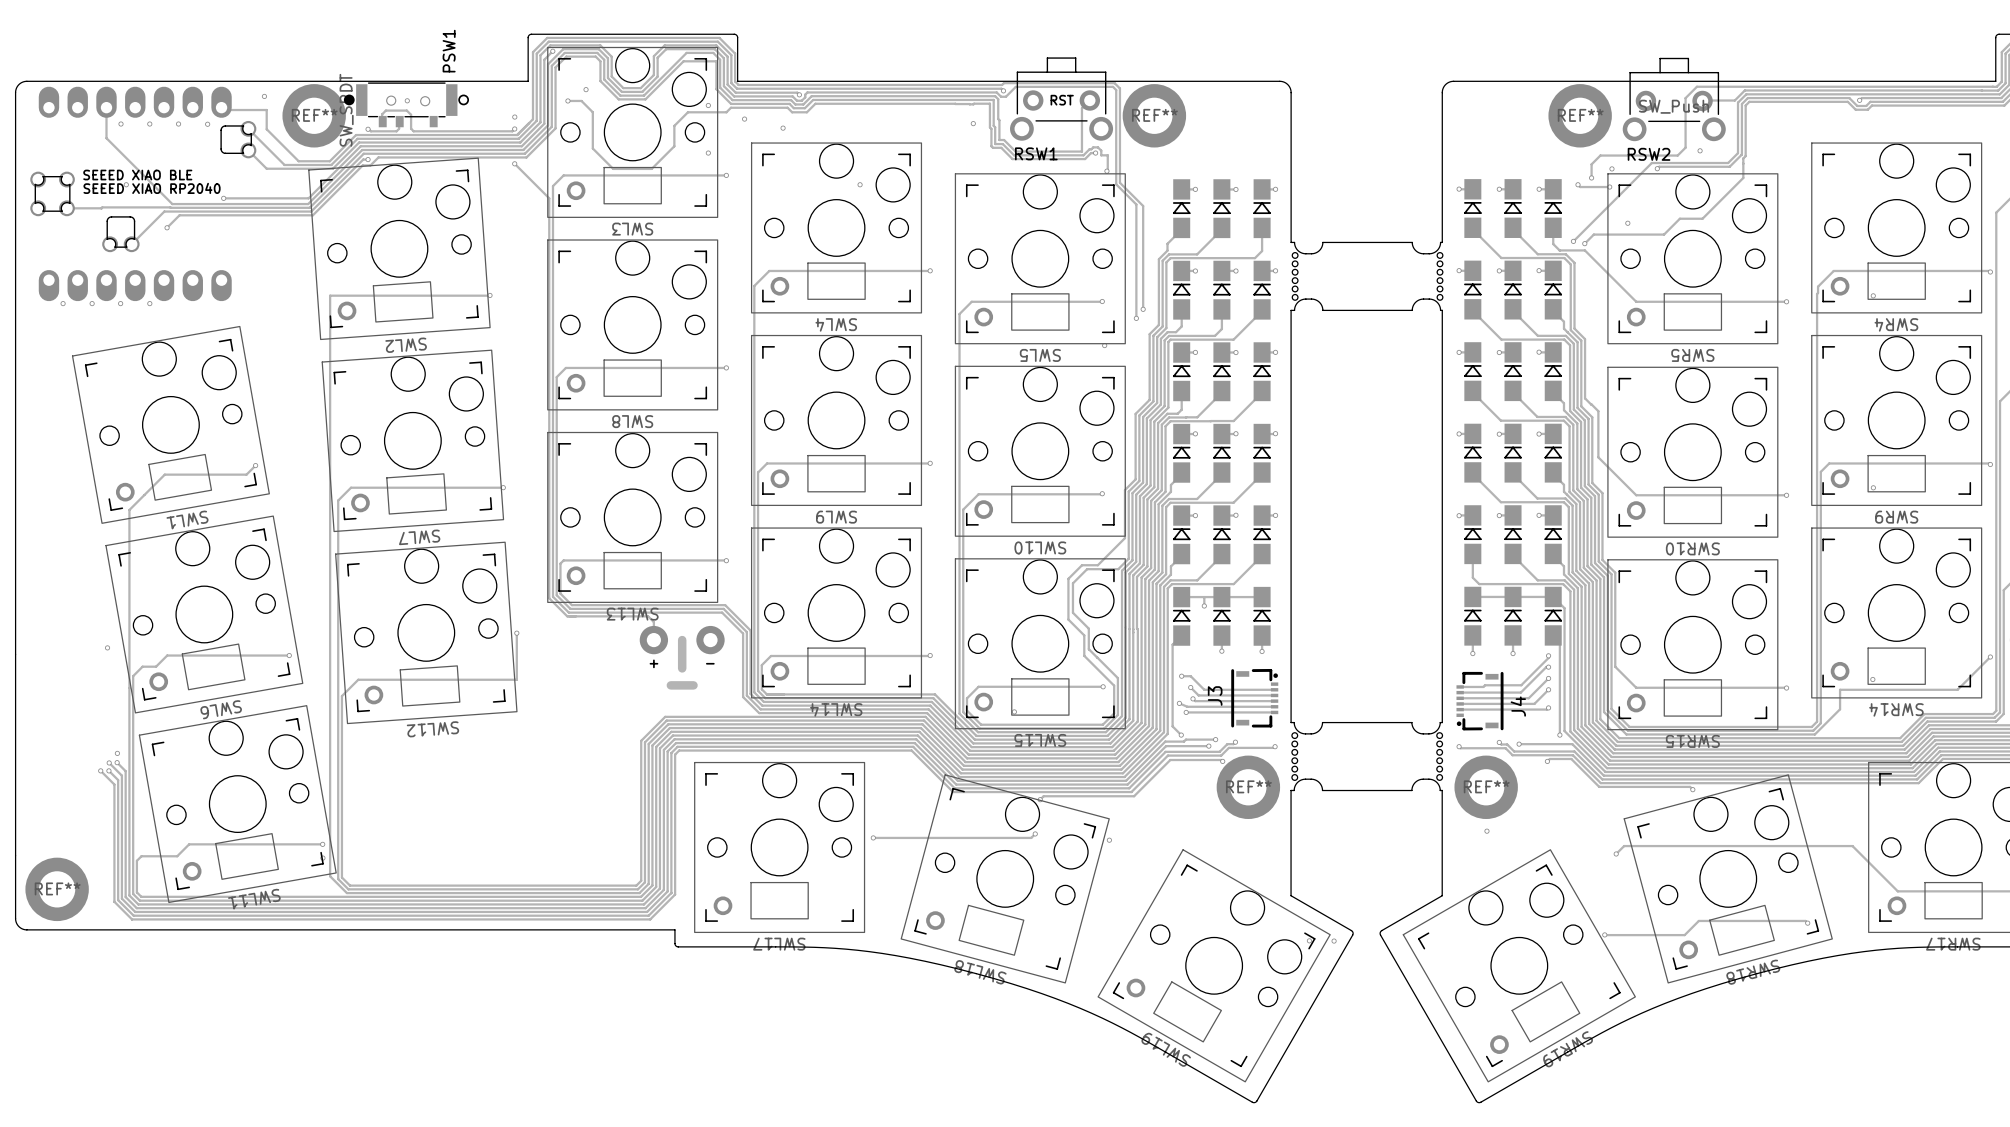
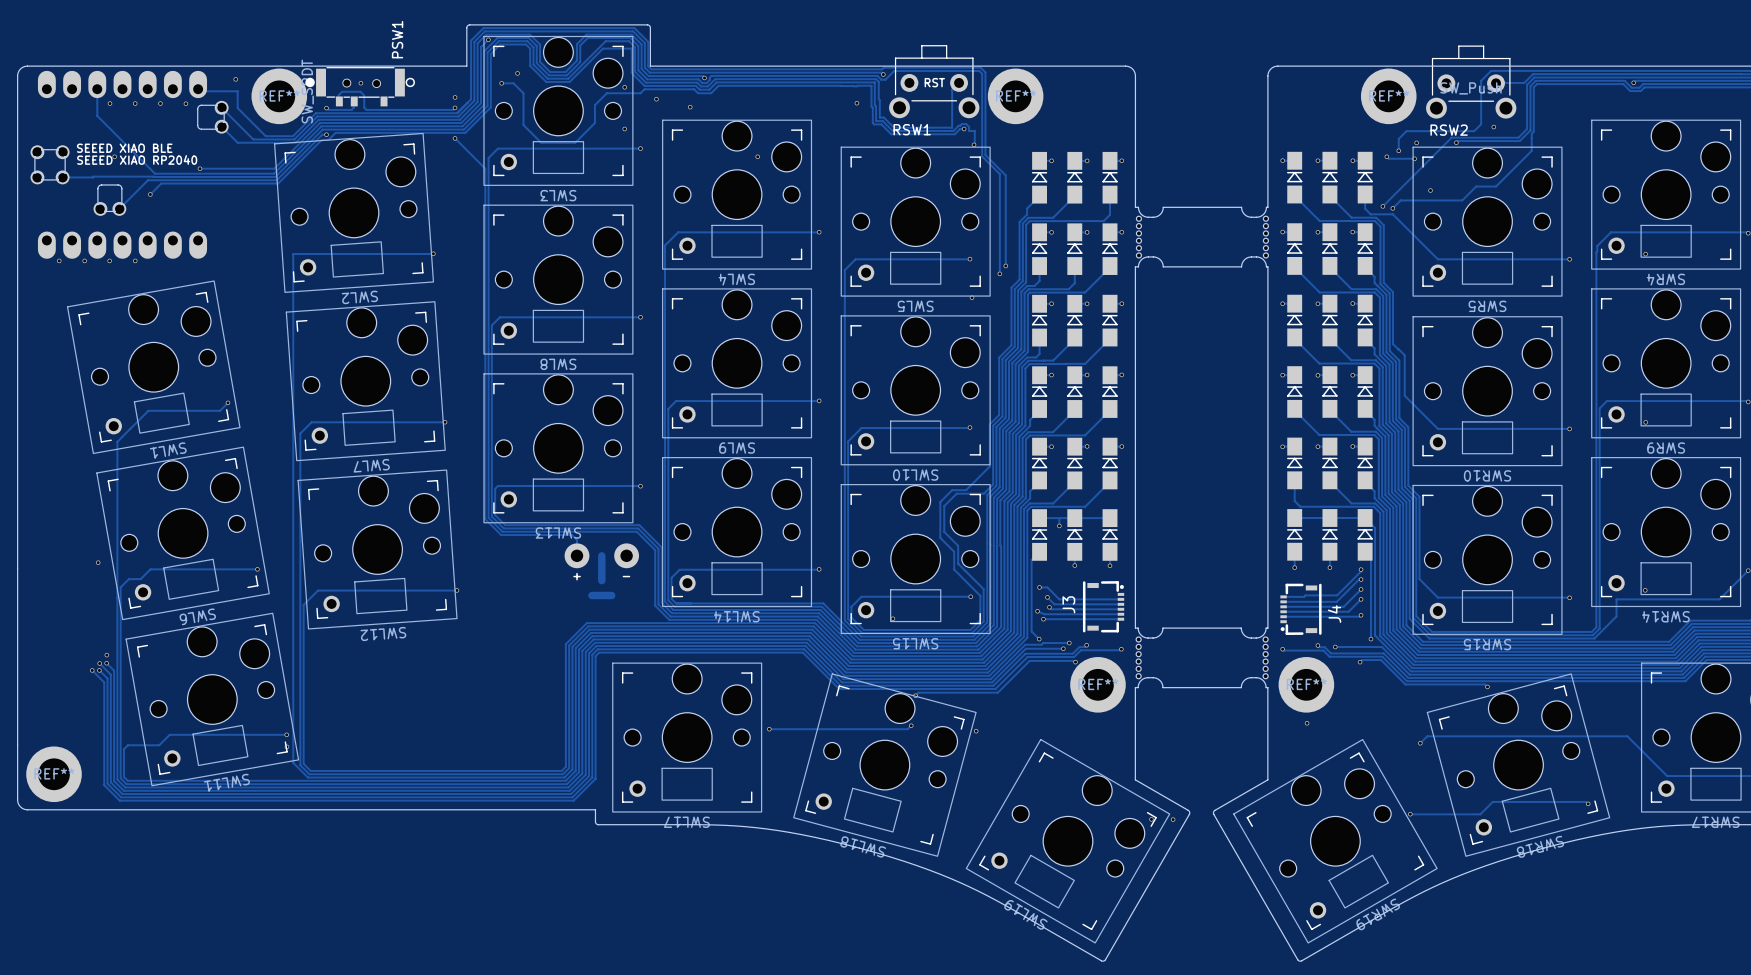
track: (516, 633) (516, 679) -> none
via position: (516, 633) -> (456, 590)

